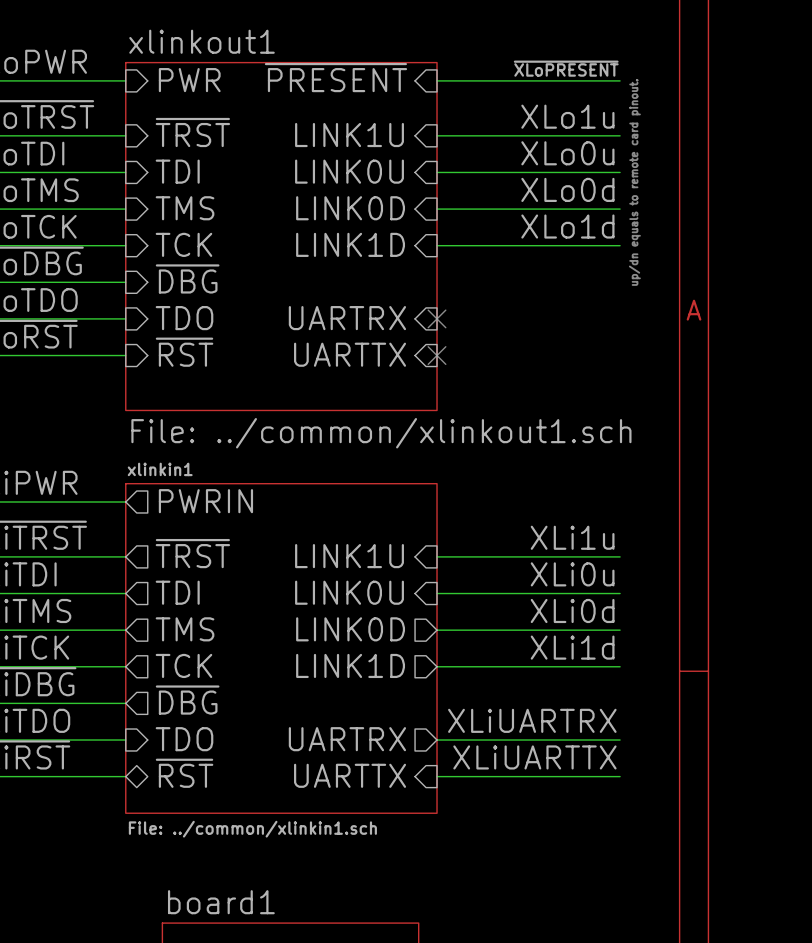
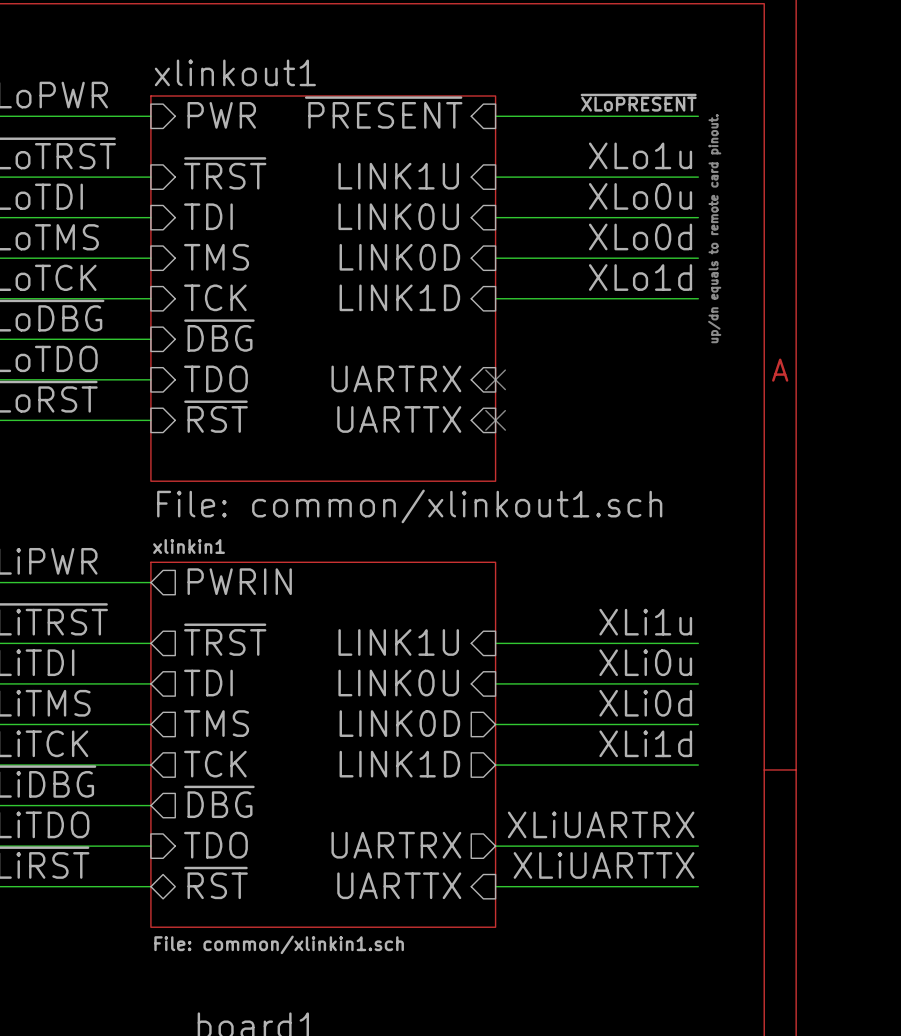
sheet xlinkout1 value: File: ../common/xlinkout1.sch (381, 433) -> File: common/xlinkout1.sch (409, 506)
sheet xlinkin1 value: File: ../common/xlinkin1.sch (252, 829) -> File: common/xlinkin1.sch (279, 944)

